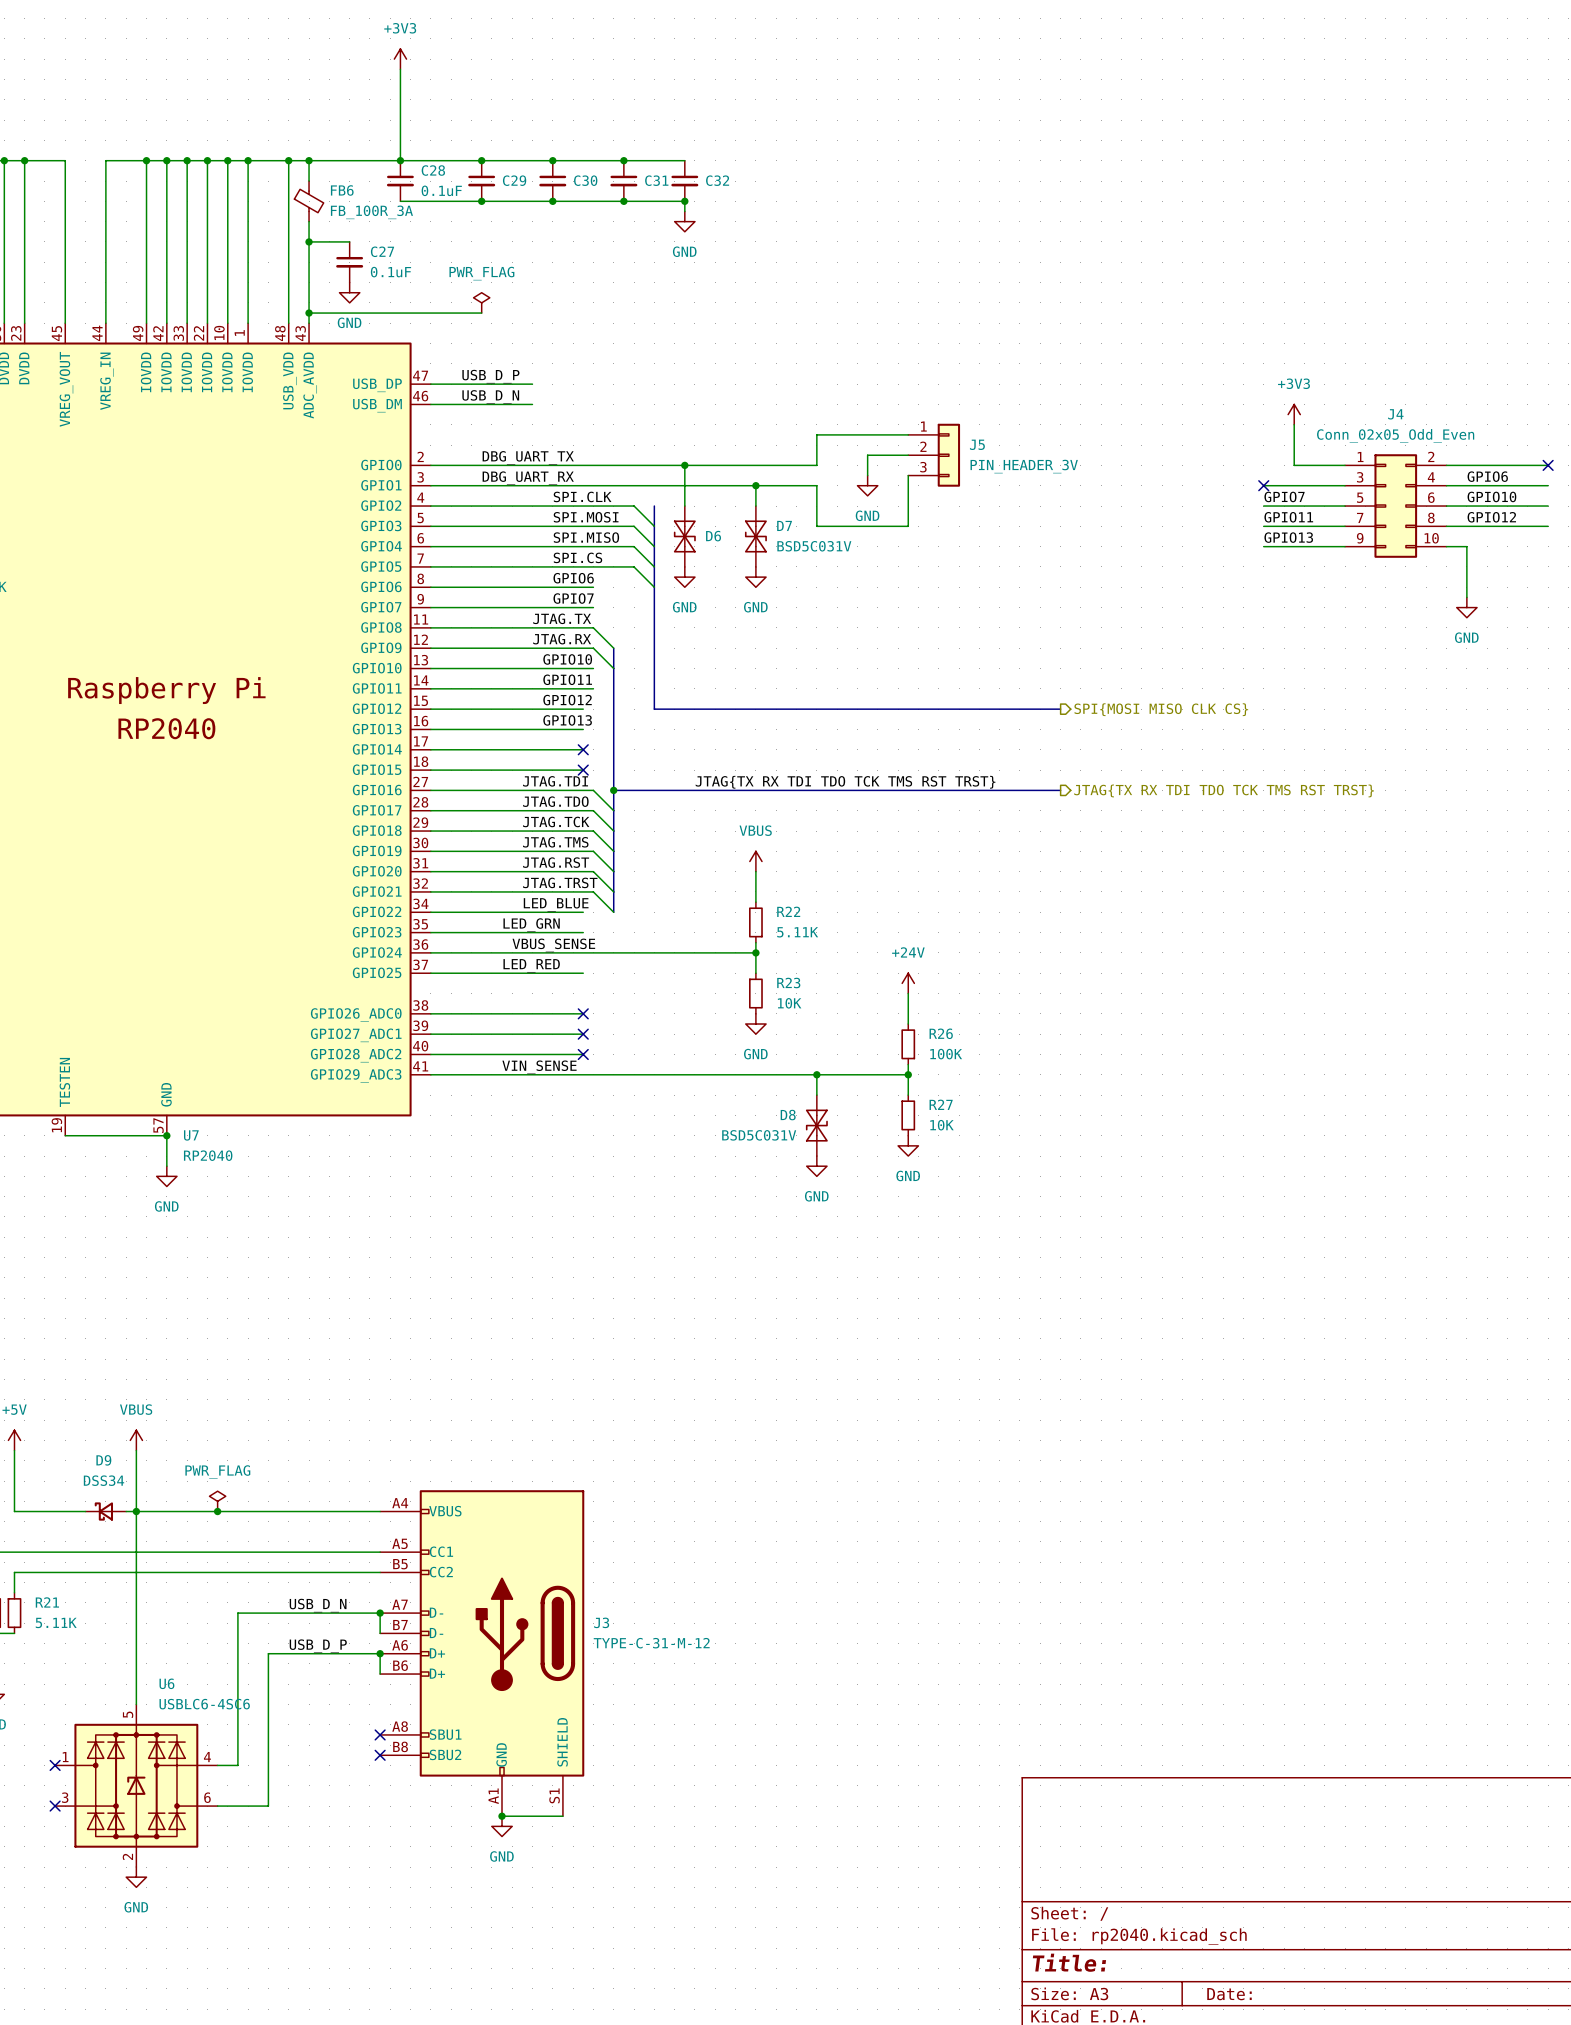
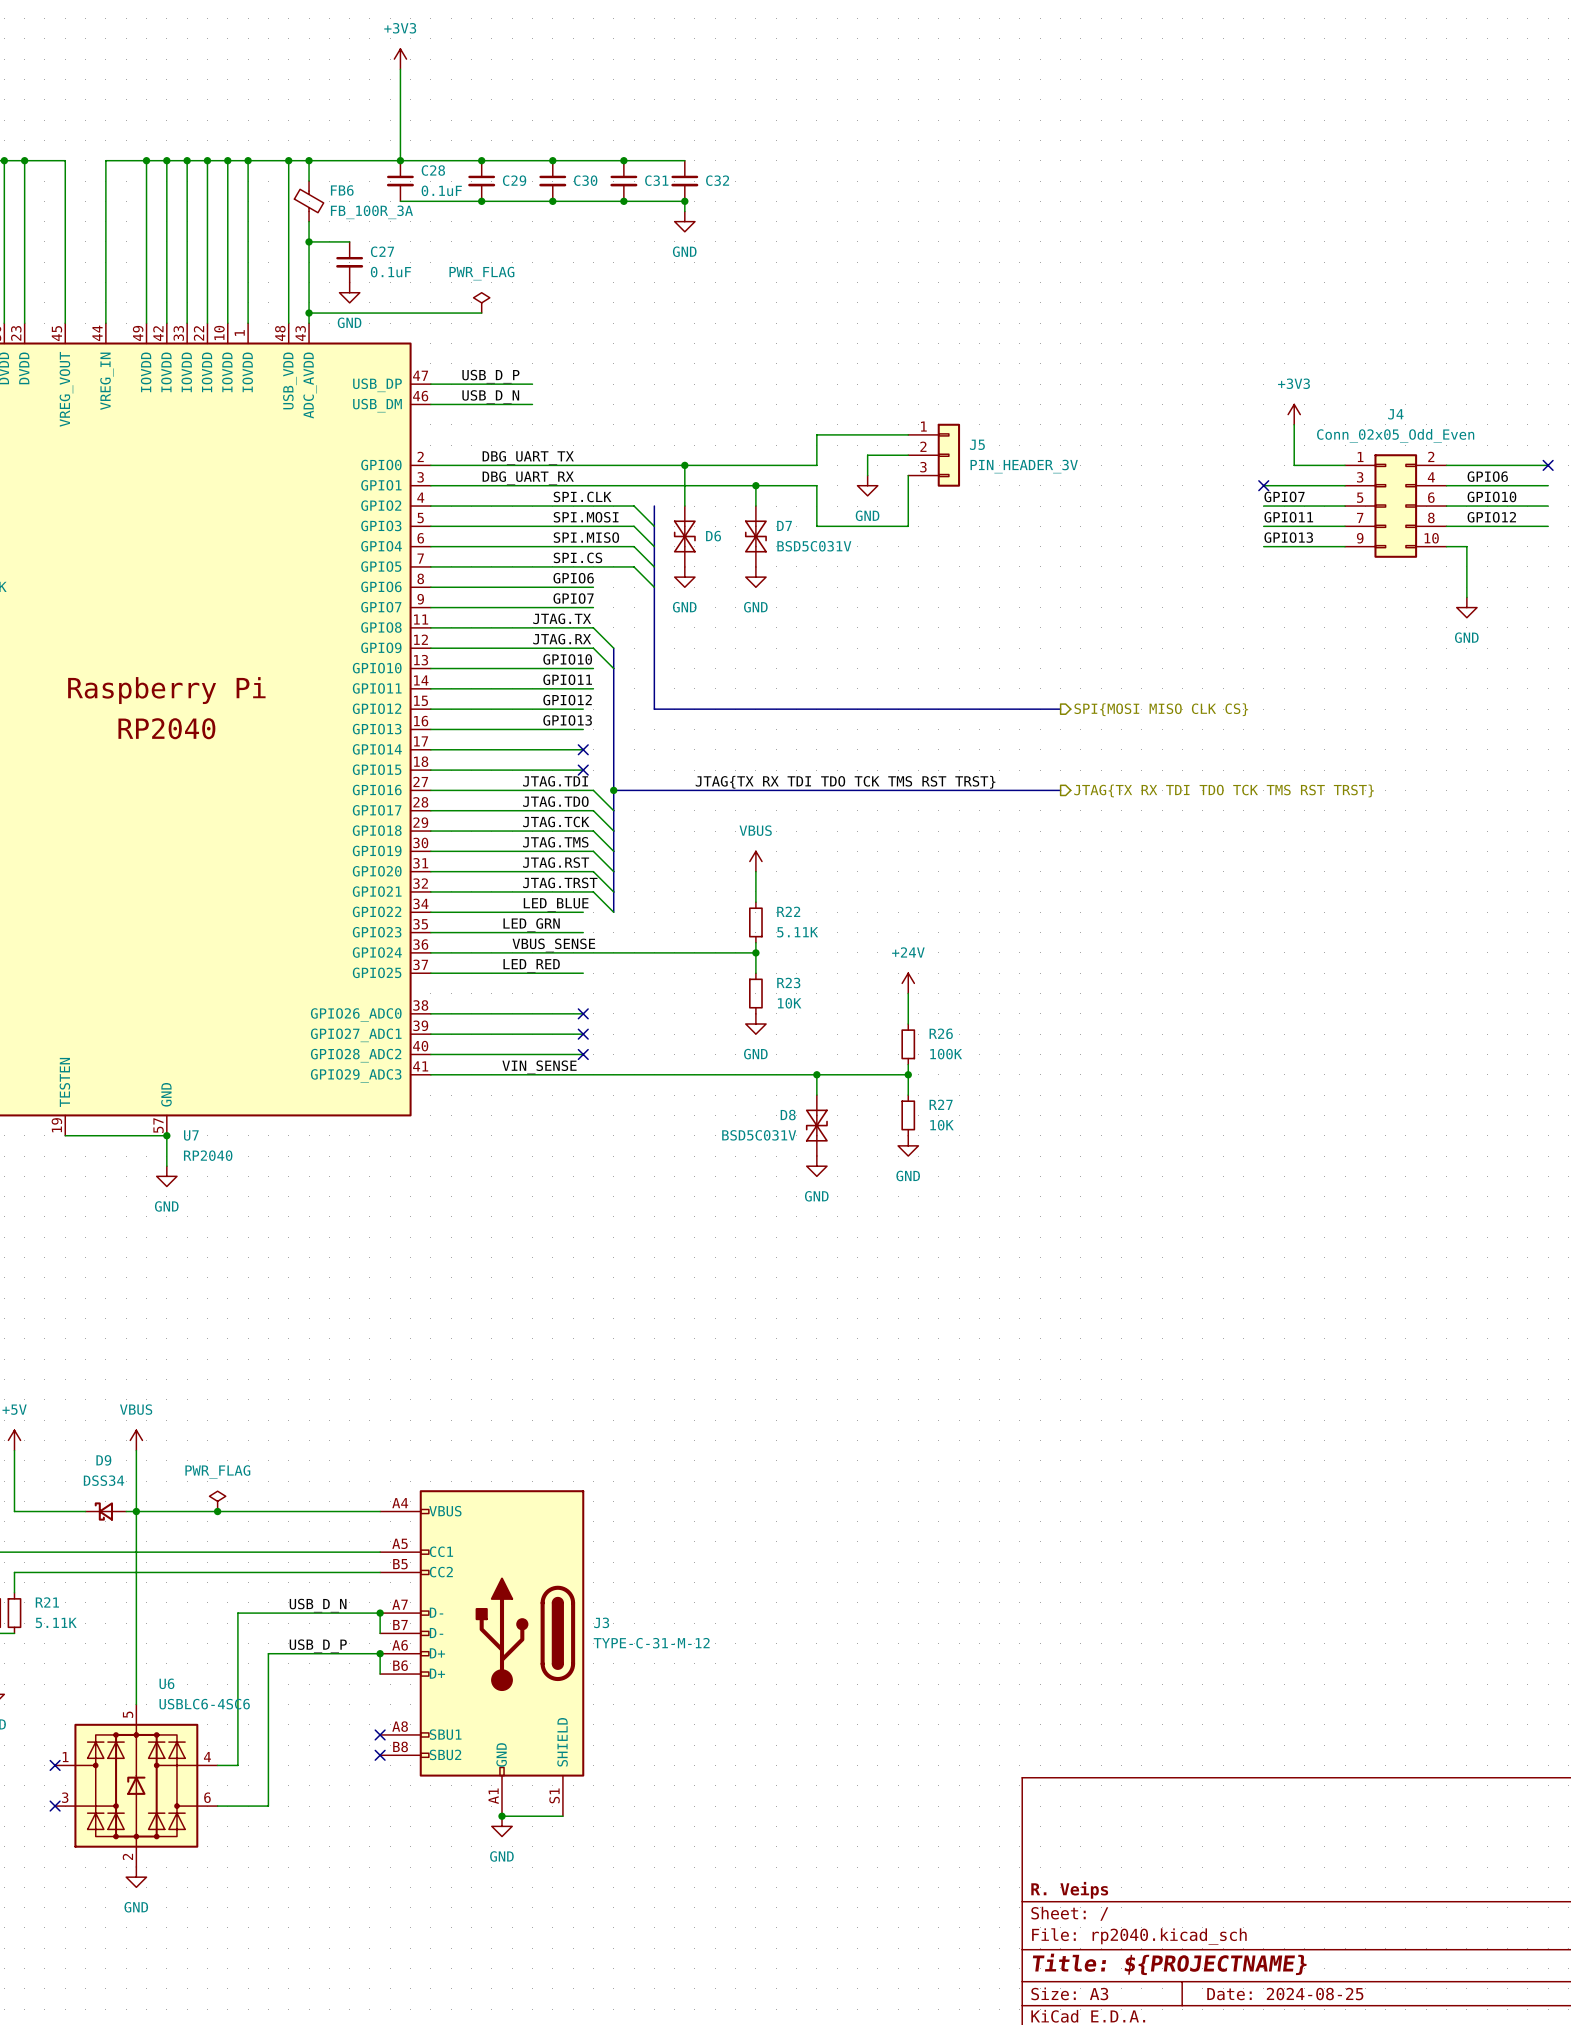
title block: none -> R. Veips (1069, 1890)
title block: Title: (1069, 1962) -> Title: ${PROJECTNAME} (1169, 1964)
title block: Date: (1229, 1994) -> Date: 2024-08-25 (1285, 1994)

